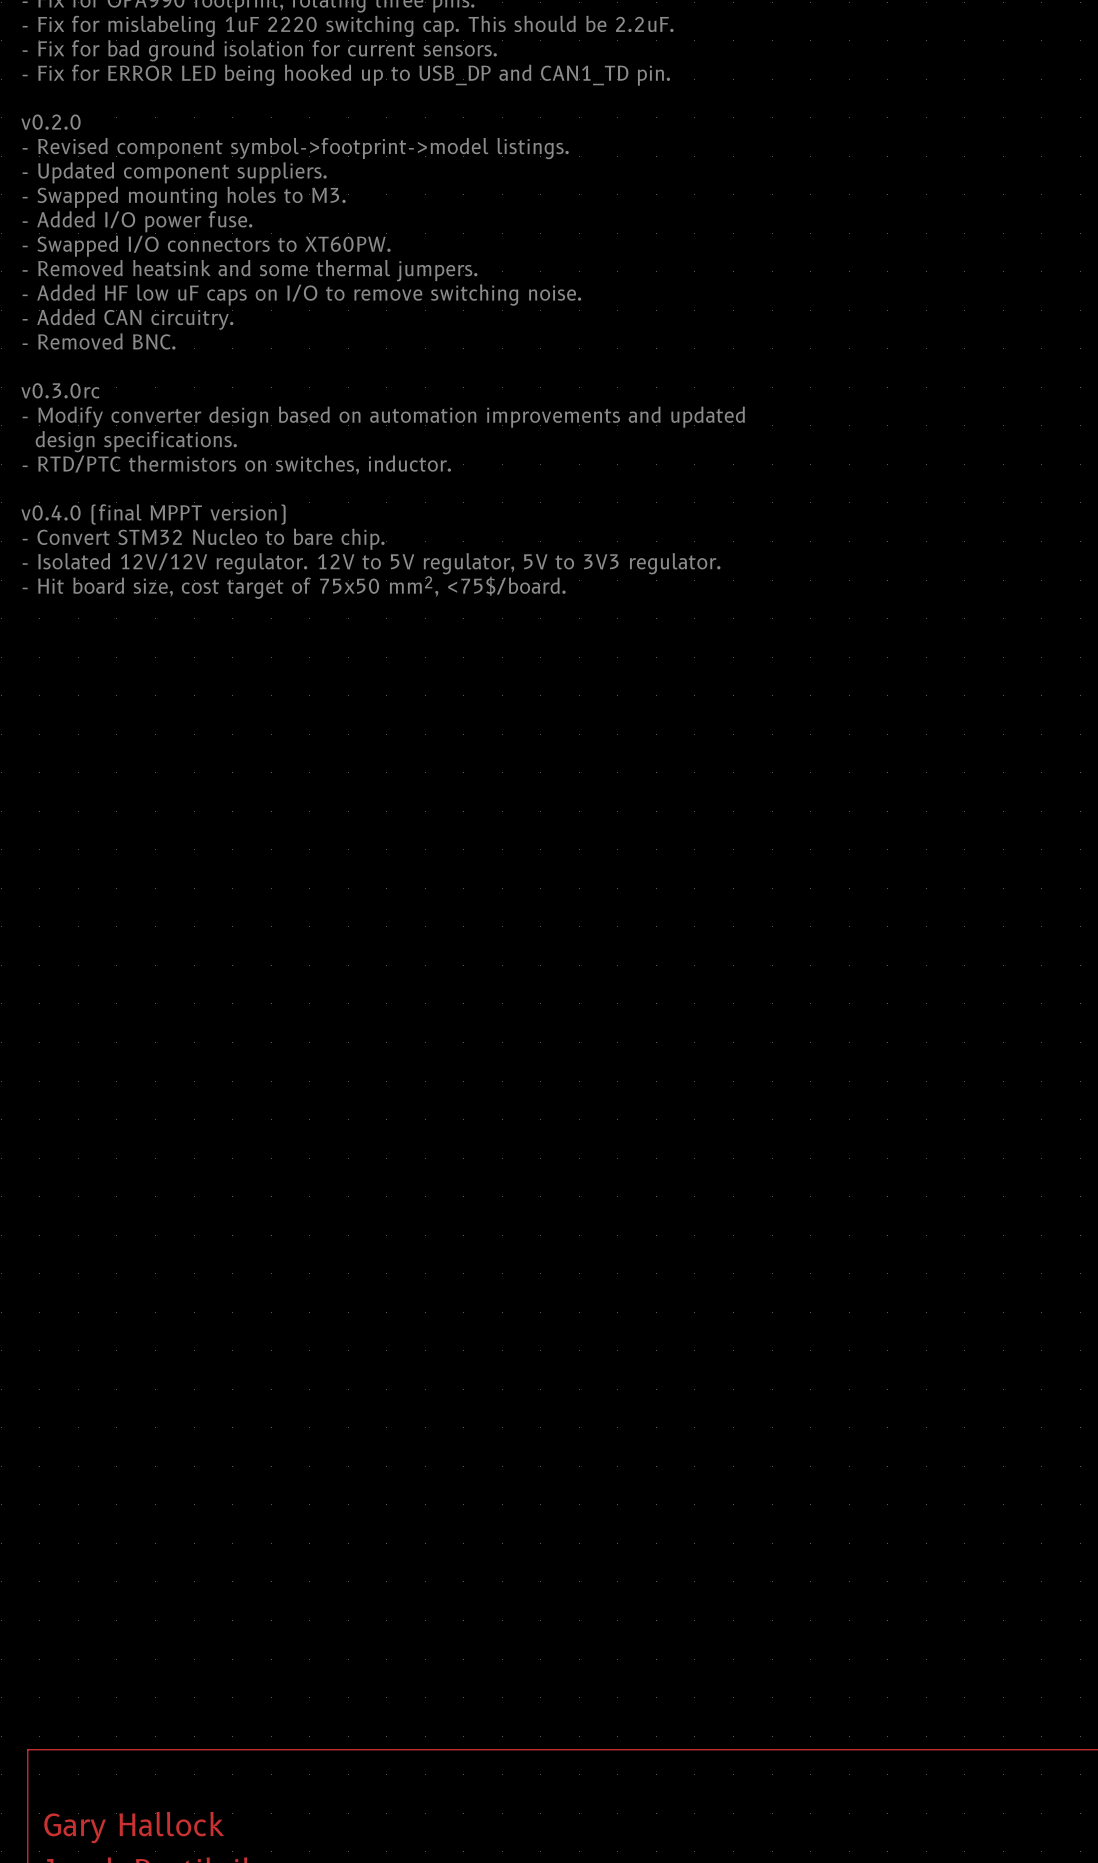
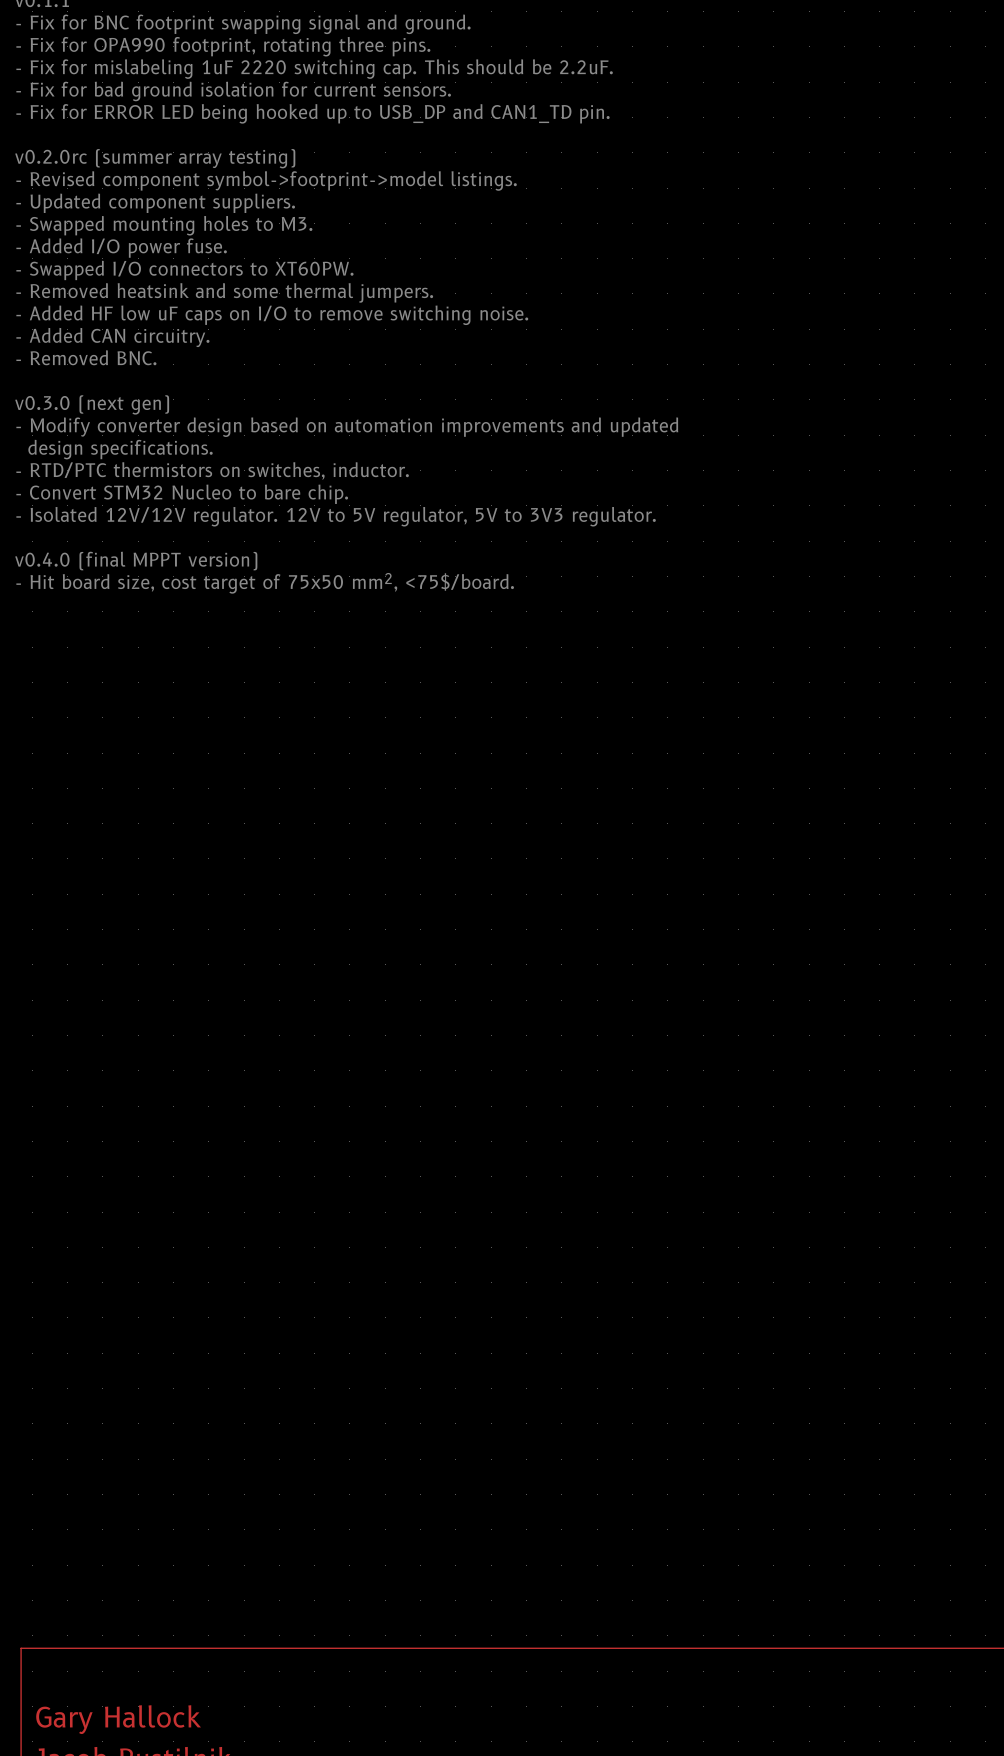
text: v0.2.0 (50, 122) -> v0.2.0rc (summer array testing) (155, 158)
text: v0.3.0rc (60, 390) -> v0.3.0 (next gen) (92, 404)
text: v0.4.0 (final MPPT version) (153, 514) -> - Isolated 12V/12V regulator. 12V to 5V regulator, 5V to 3V3 regulator. (336, 516)
text position: - Convert STM32 Nucleo to bare chip. (203, 539) -> - Convert STM32 Nucleo to bare chip. (182, 494)
text: - Isolated 12V/12V regulator. 12V to 5V regulator, 5V to 3V3 regulator. (371, 563) -> v0.4.0 (final MPPT version) (136, 561)

